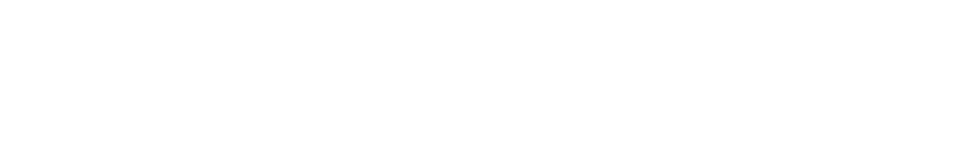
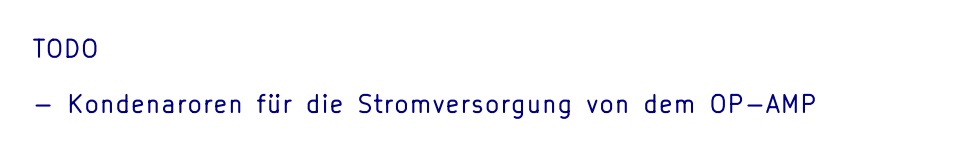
text: none -> TODO (64, 48)
text: none -> - Kondenaroren für die Stromversorgung von dem OP-AMP (425, 106)

